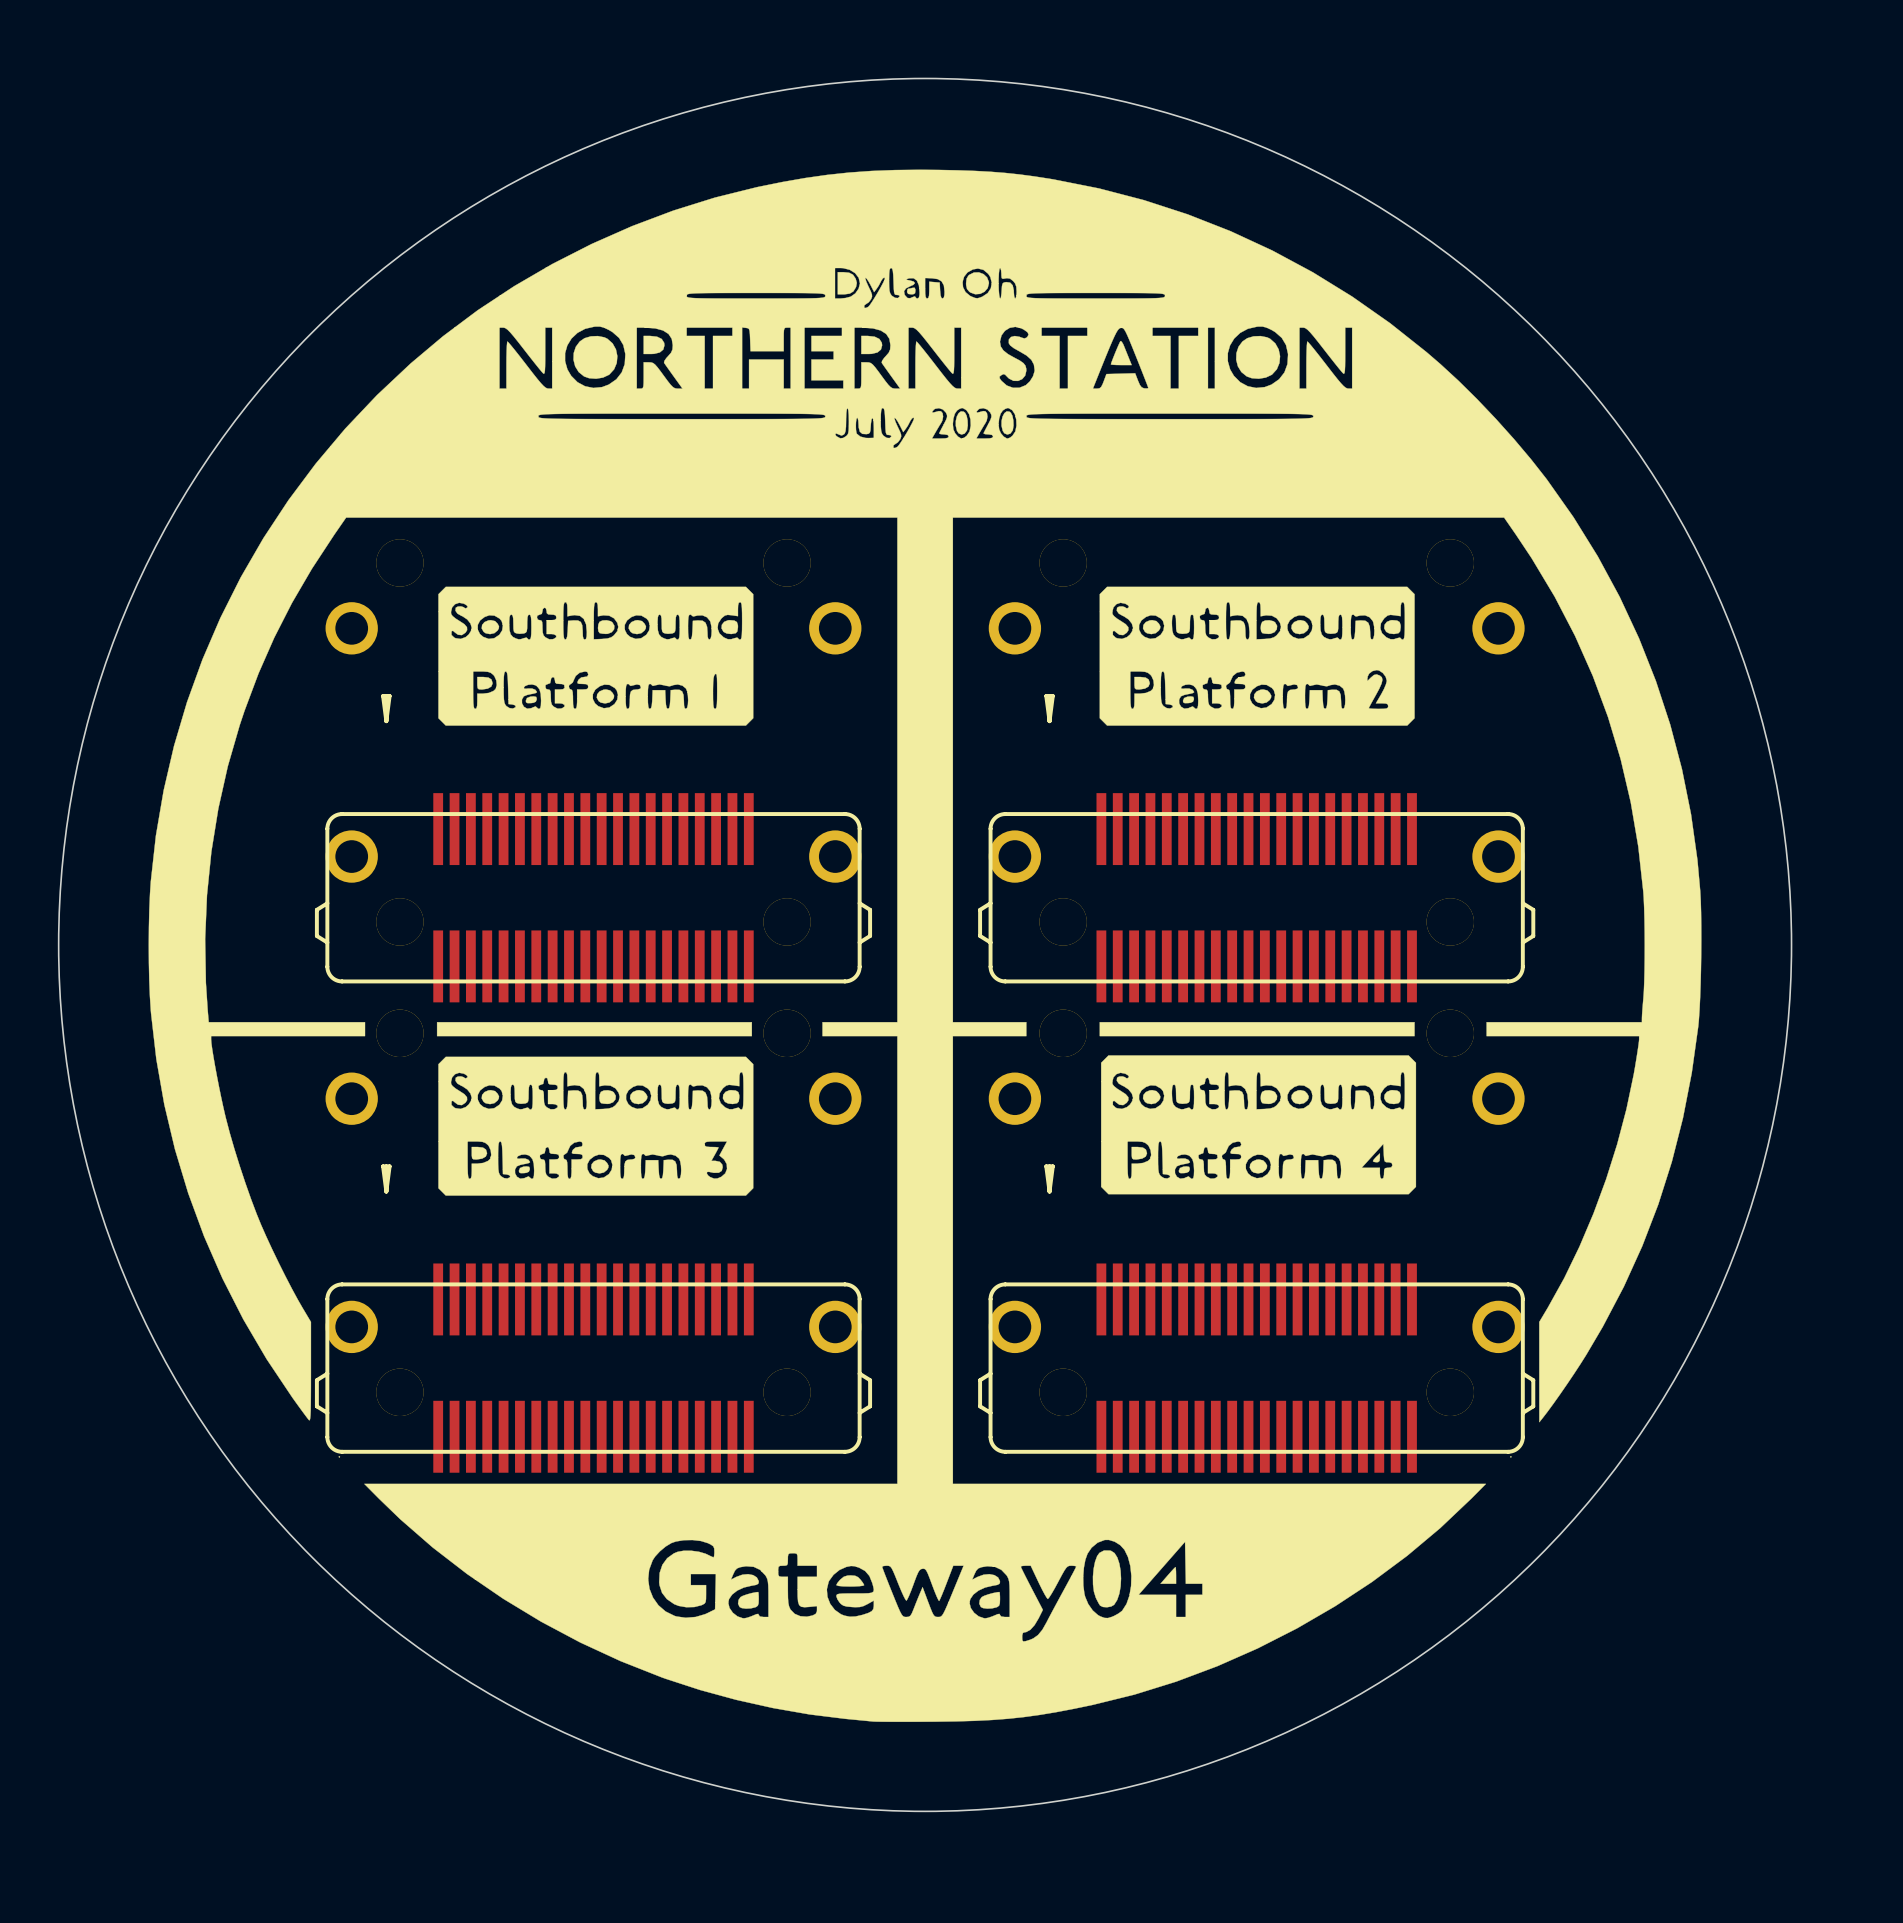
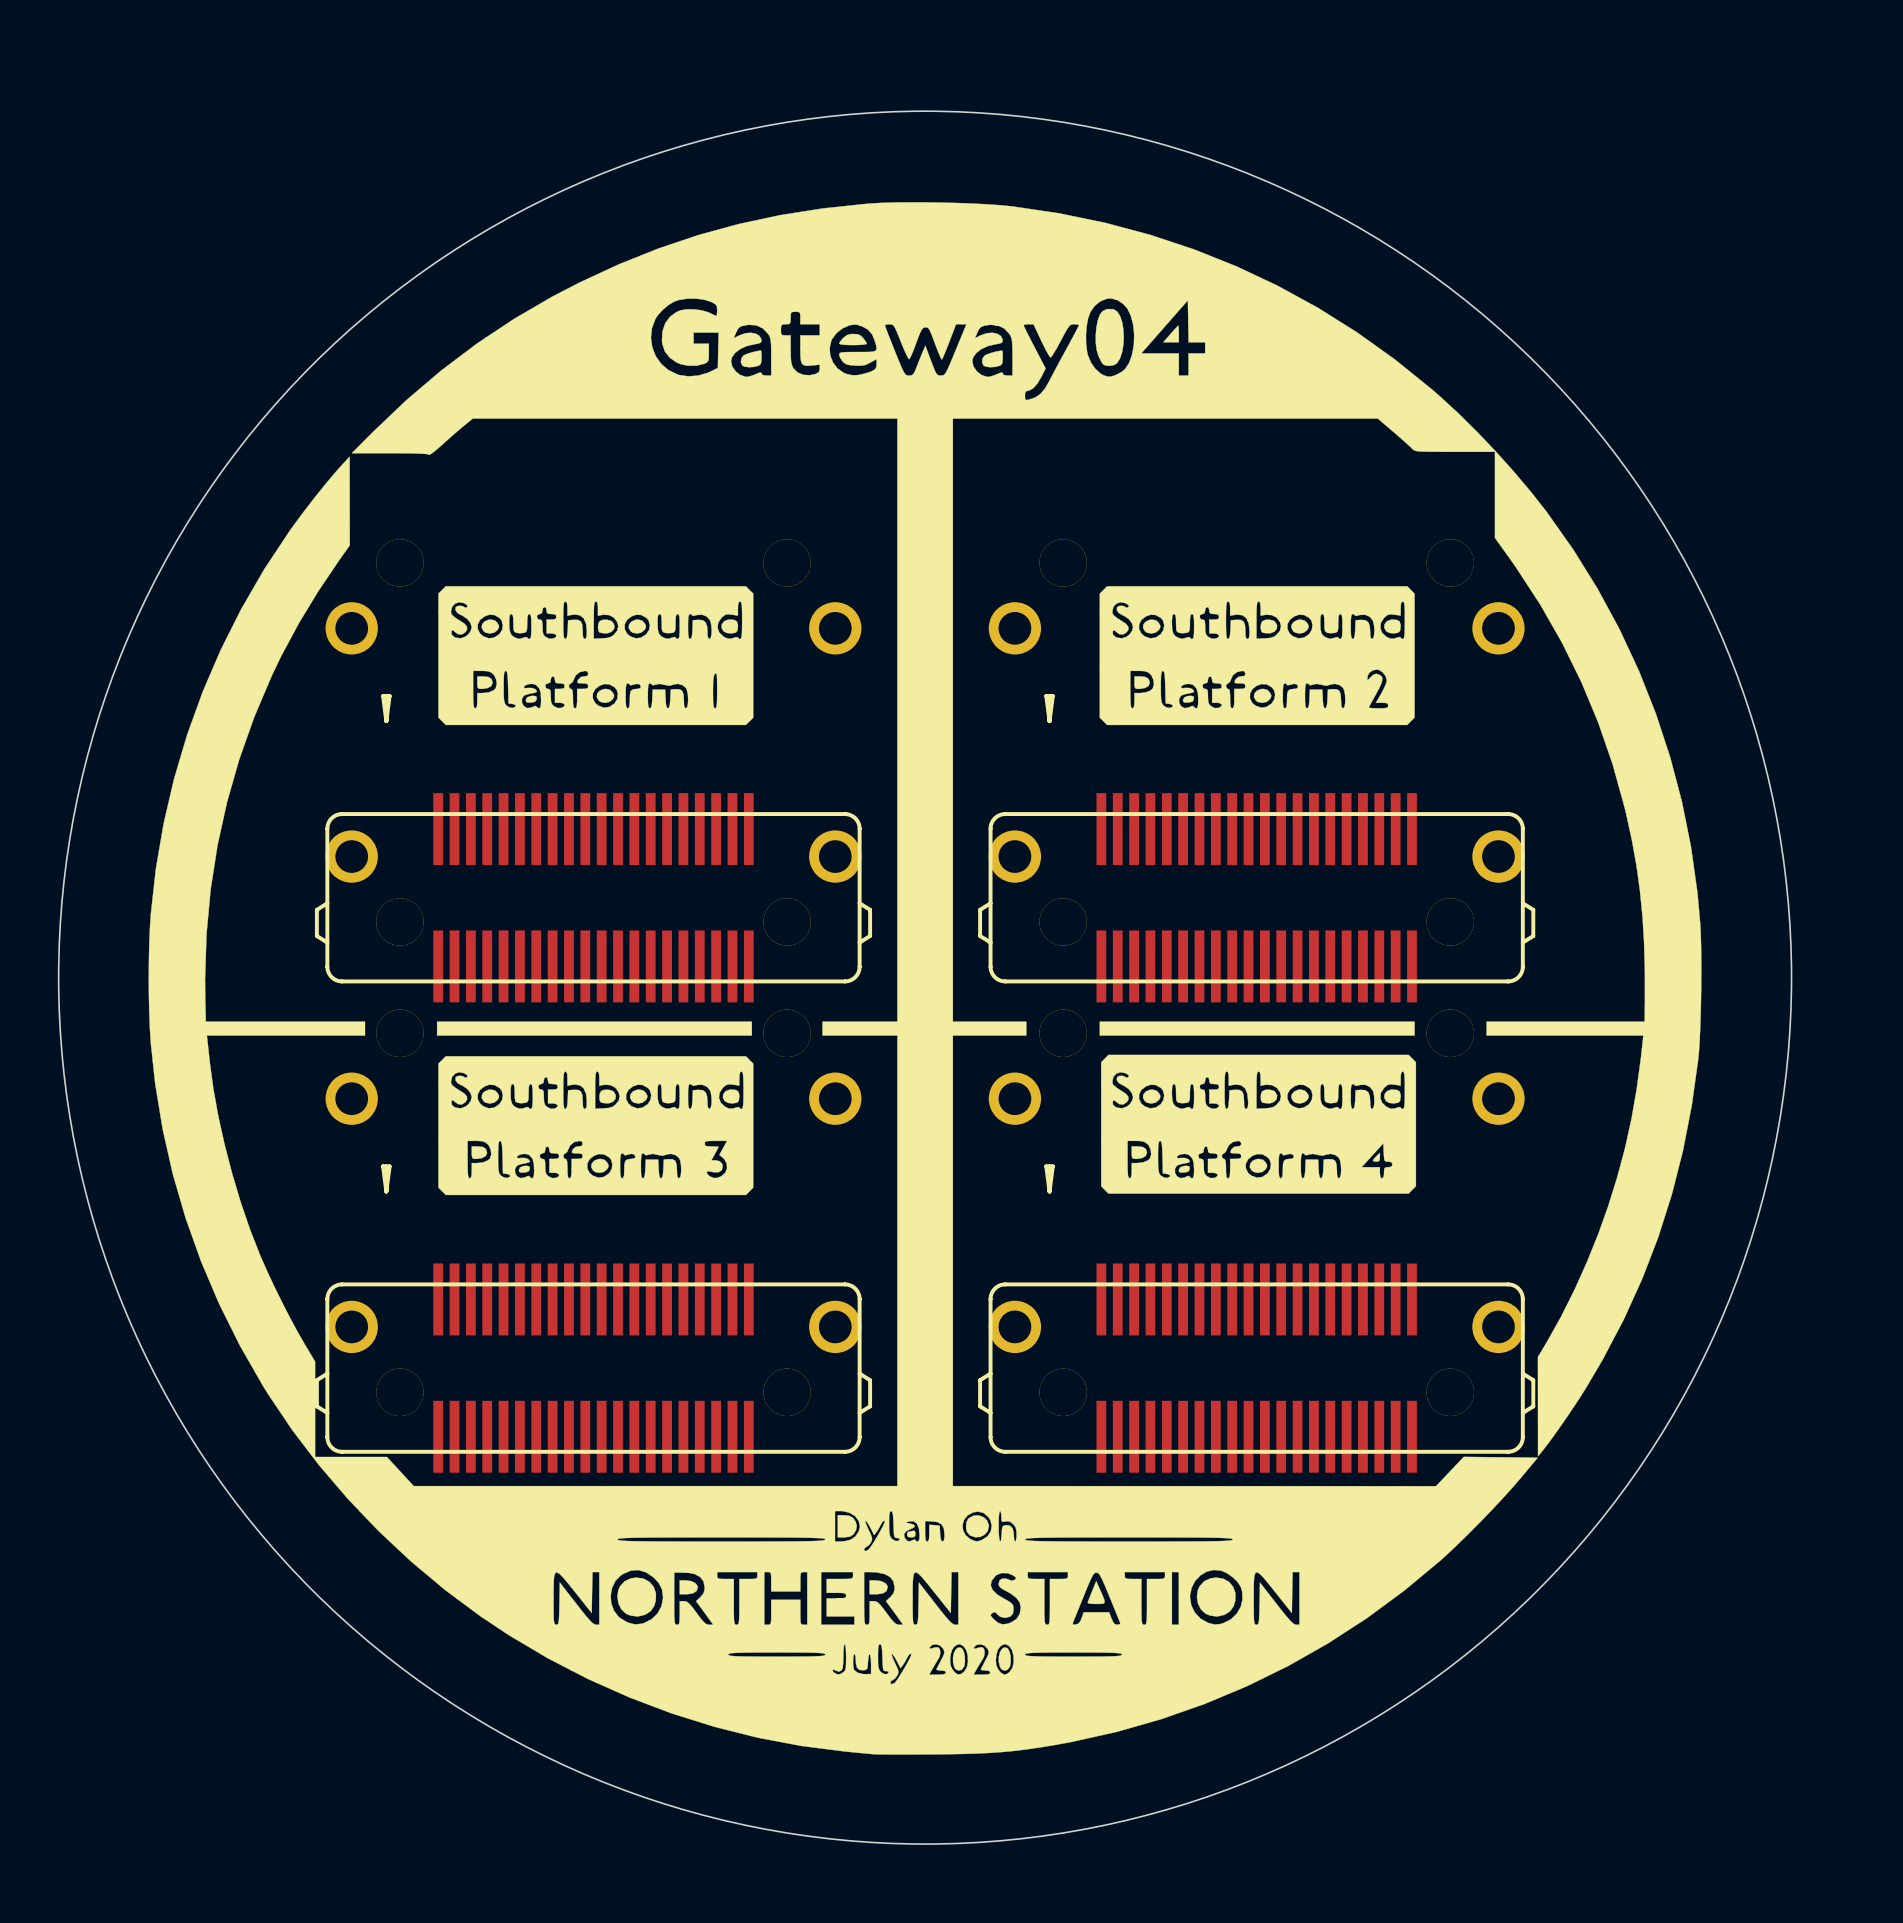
drawing shape: [148, 169, 1702, 1722] -> [148, 202, 1702, 1755]
round board edge position: (925, 944) -> (925, 977)

